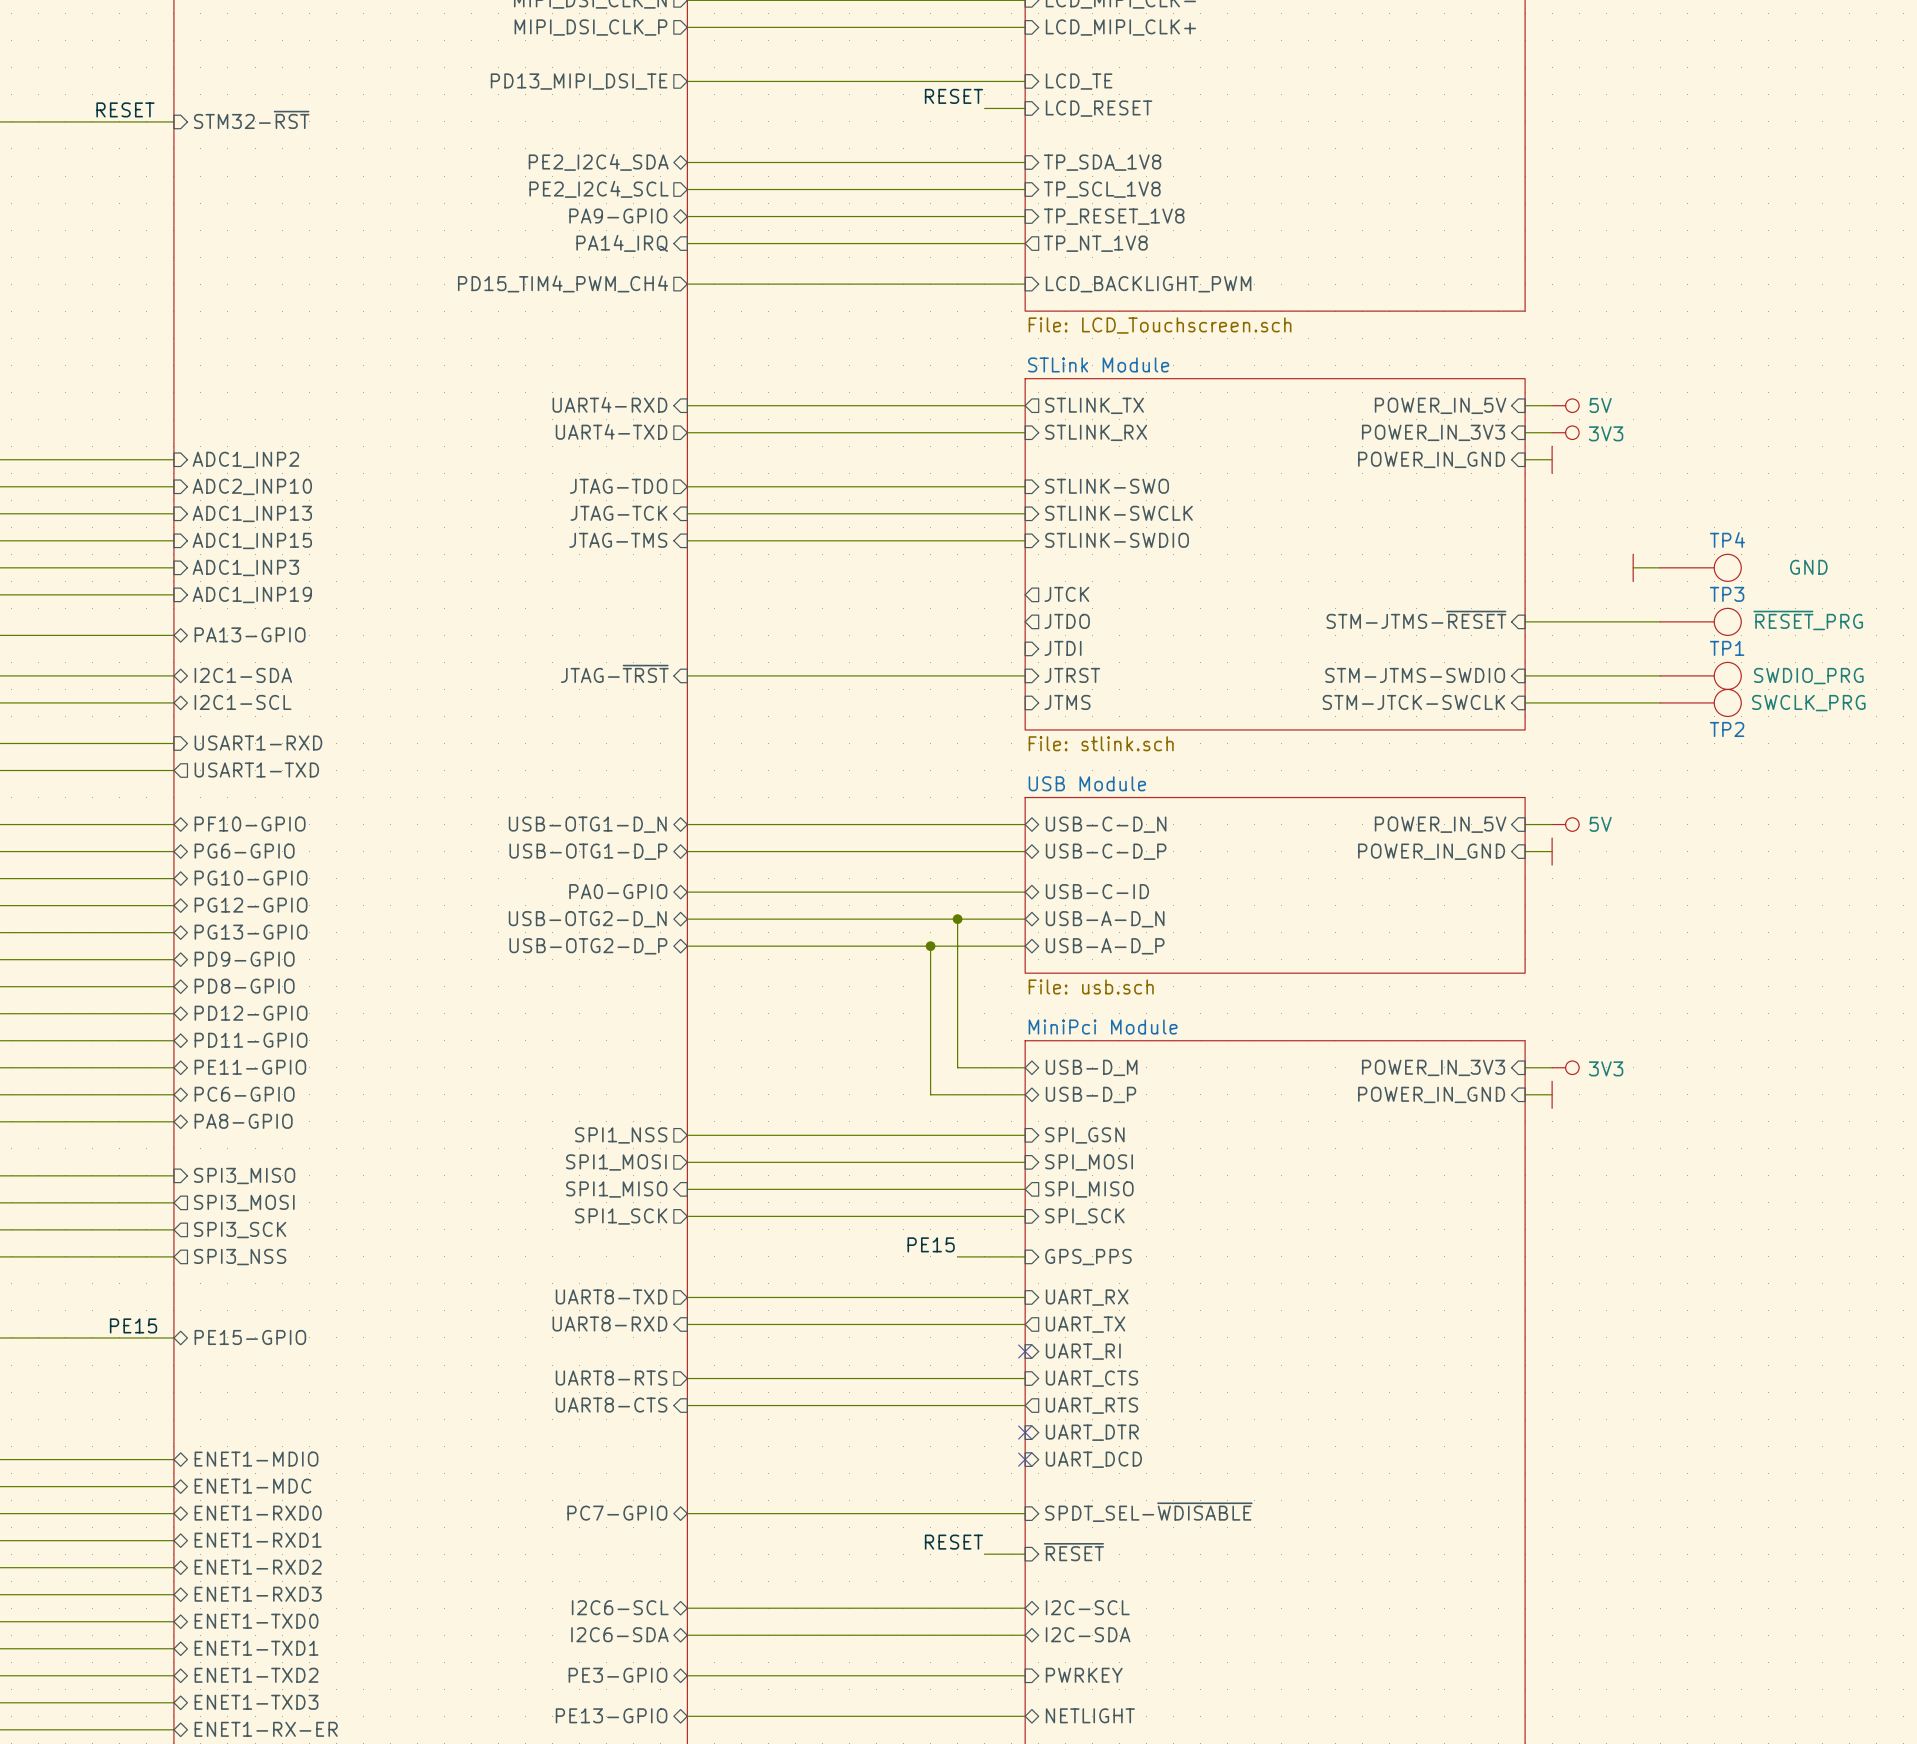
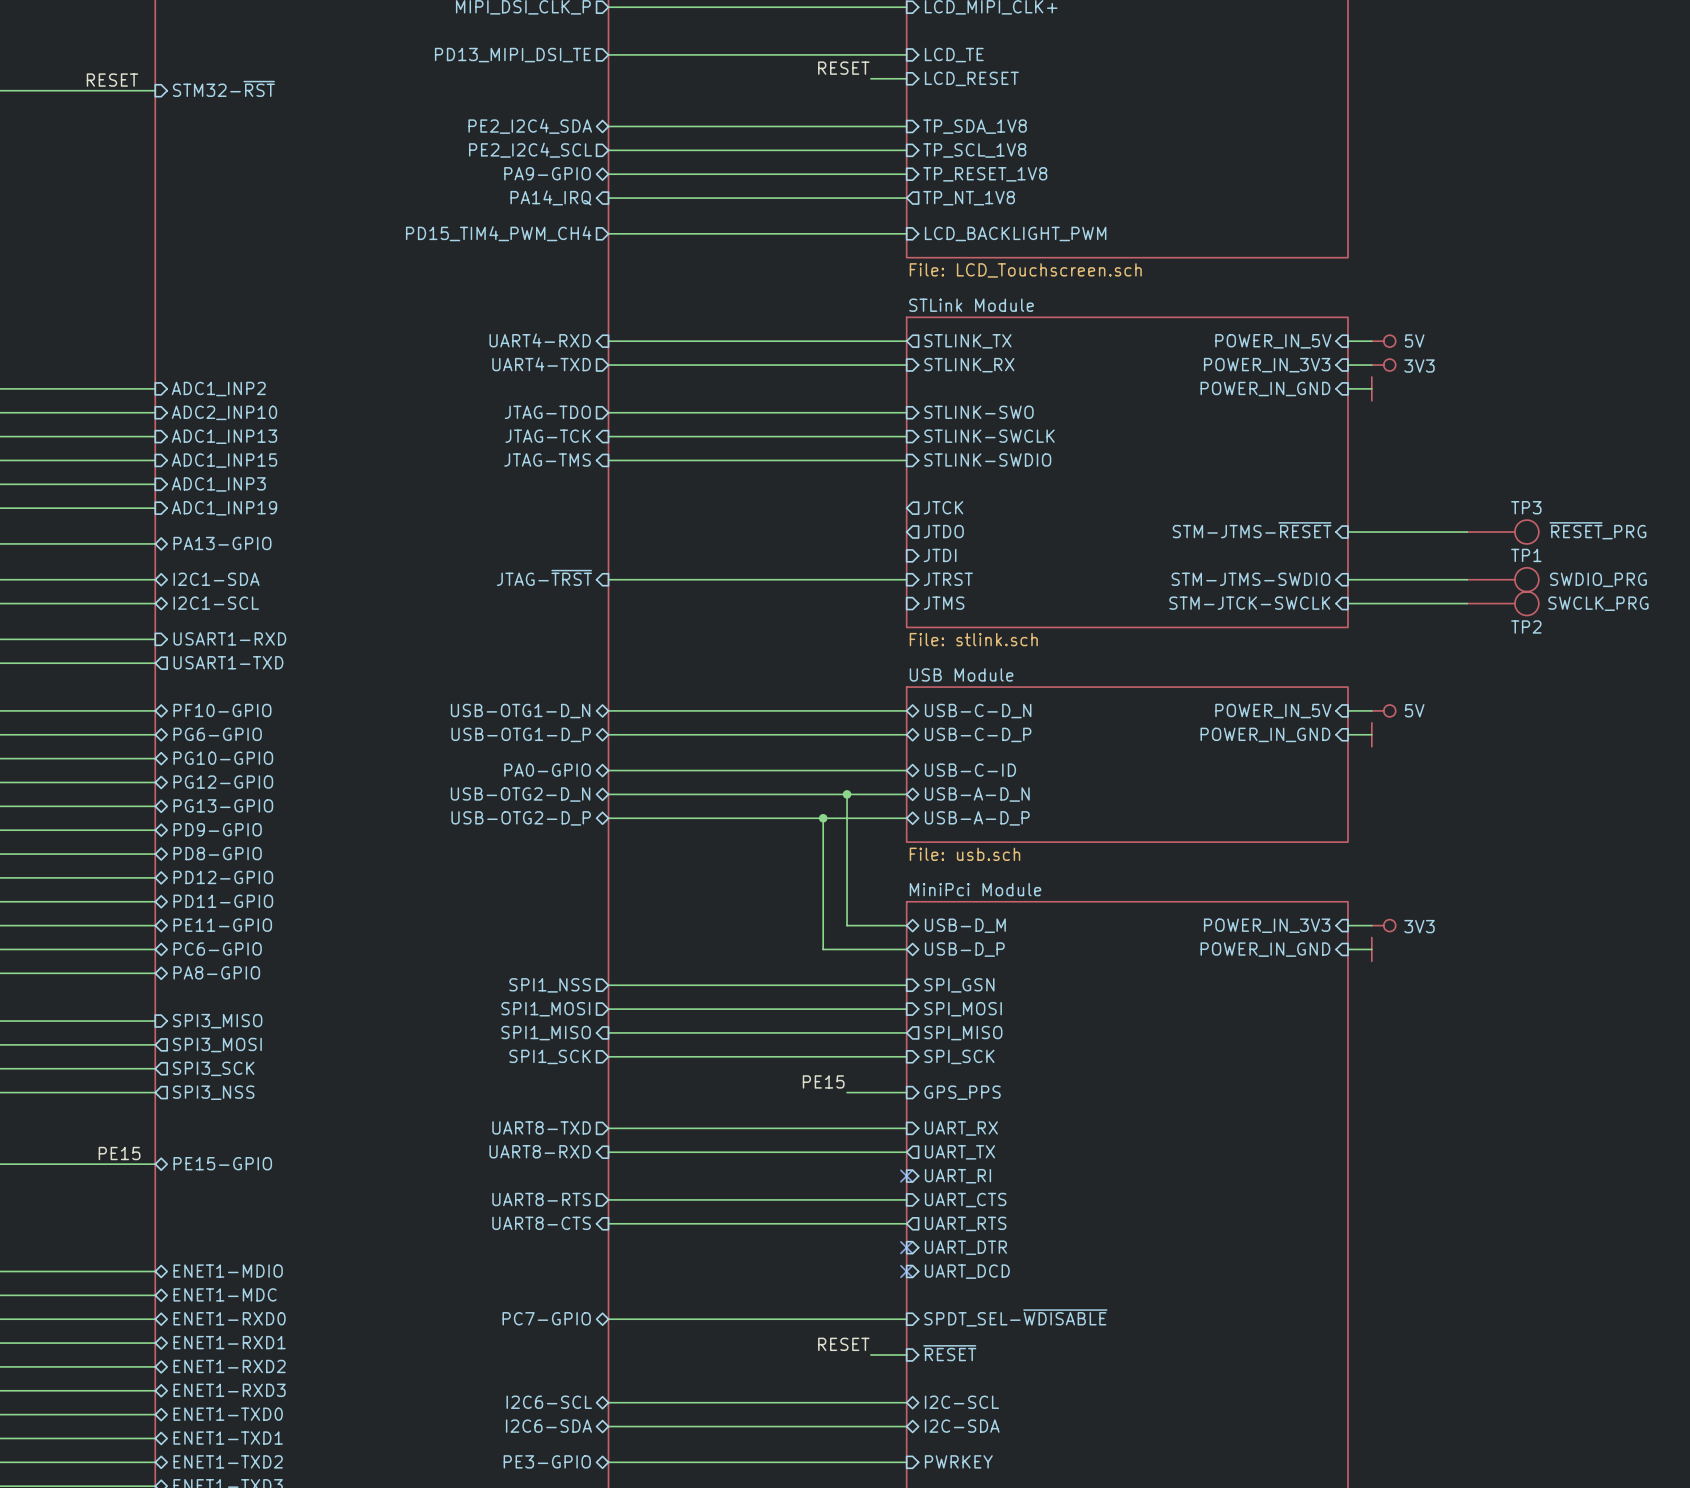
wire: (1633, 567) (1660, 567) -> none
power symbol: (1633, 567) -> none
TP4: GND (1700, 567) -> none

